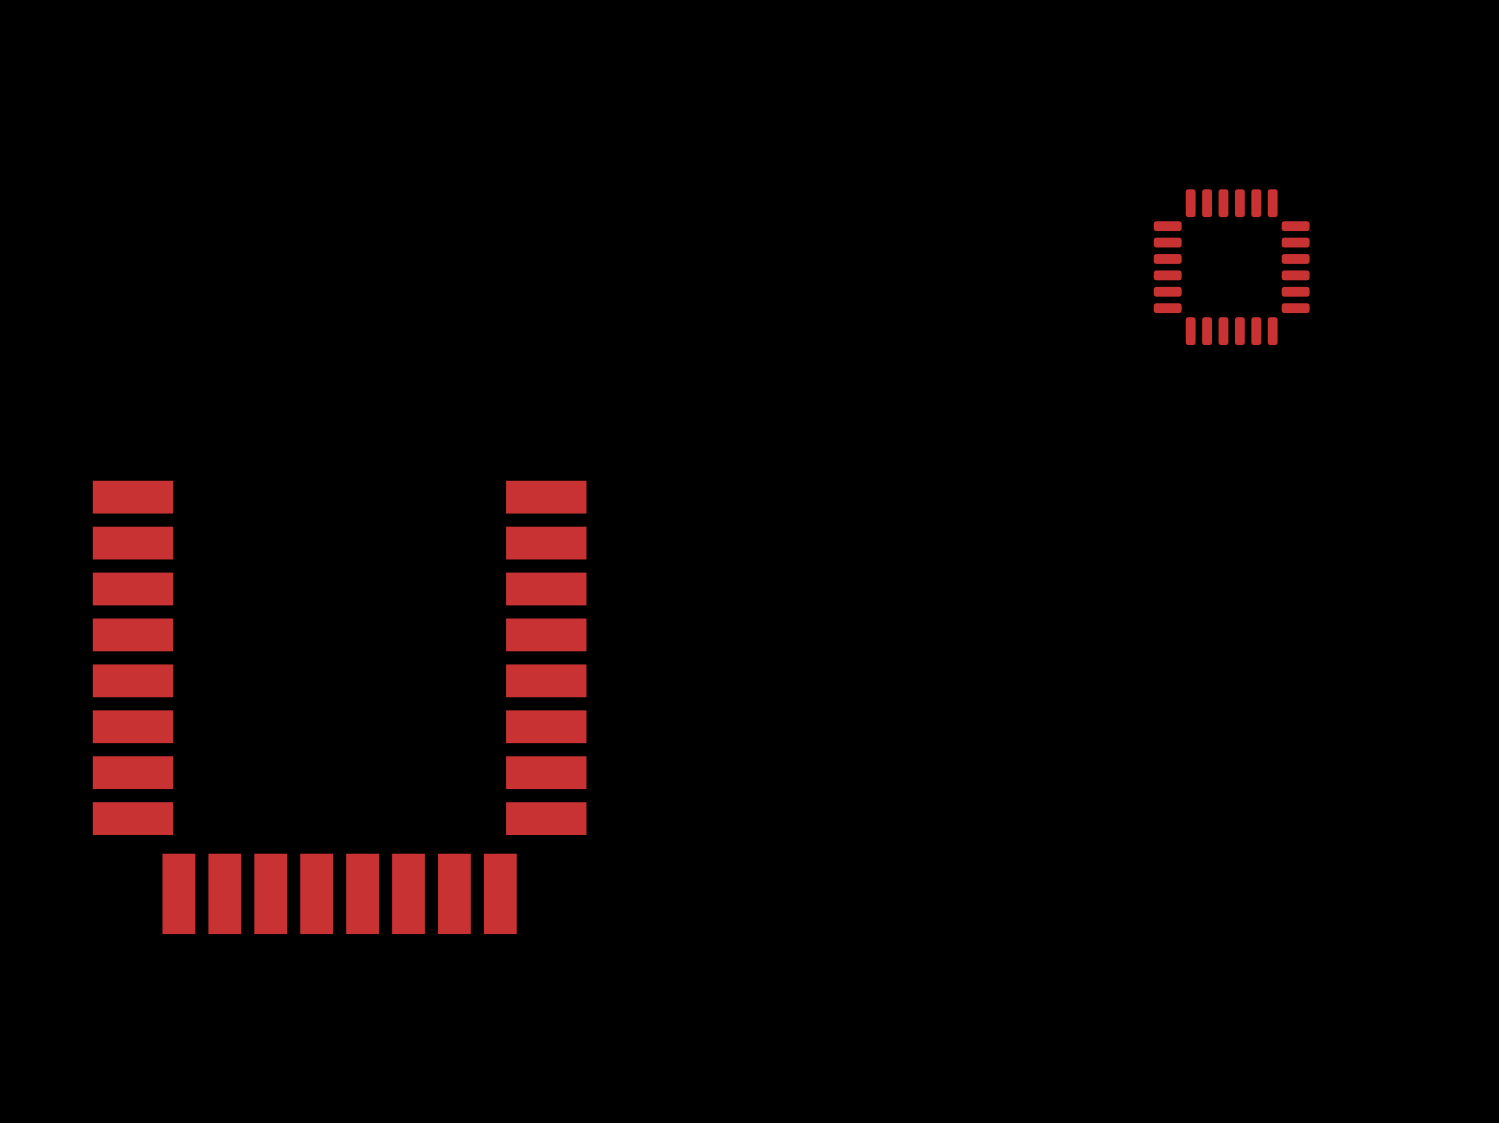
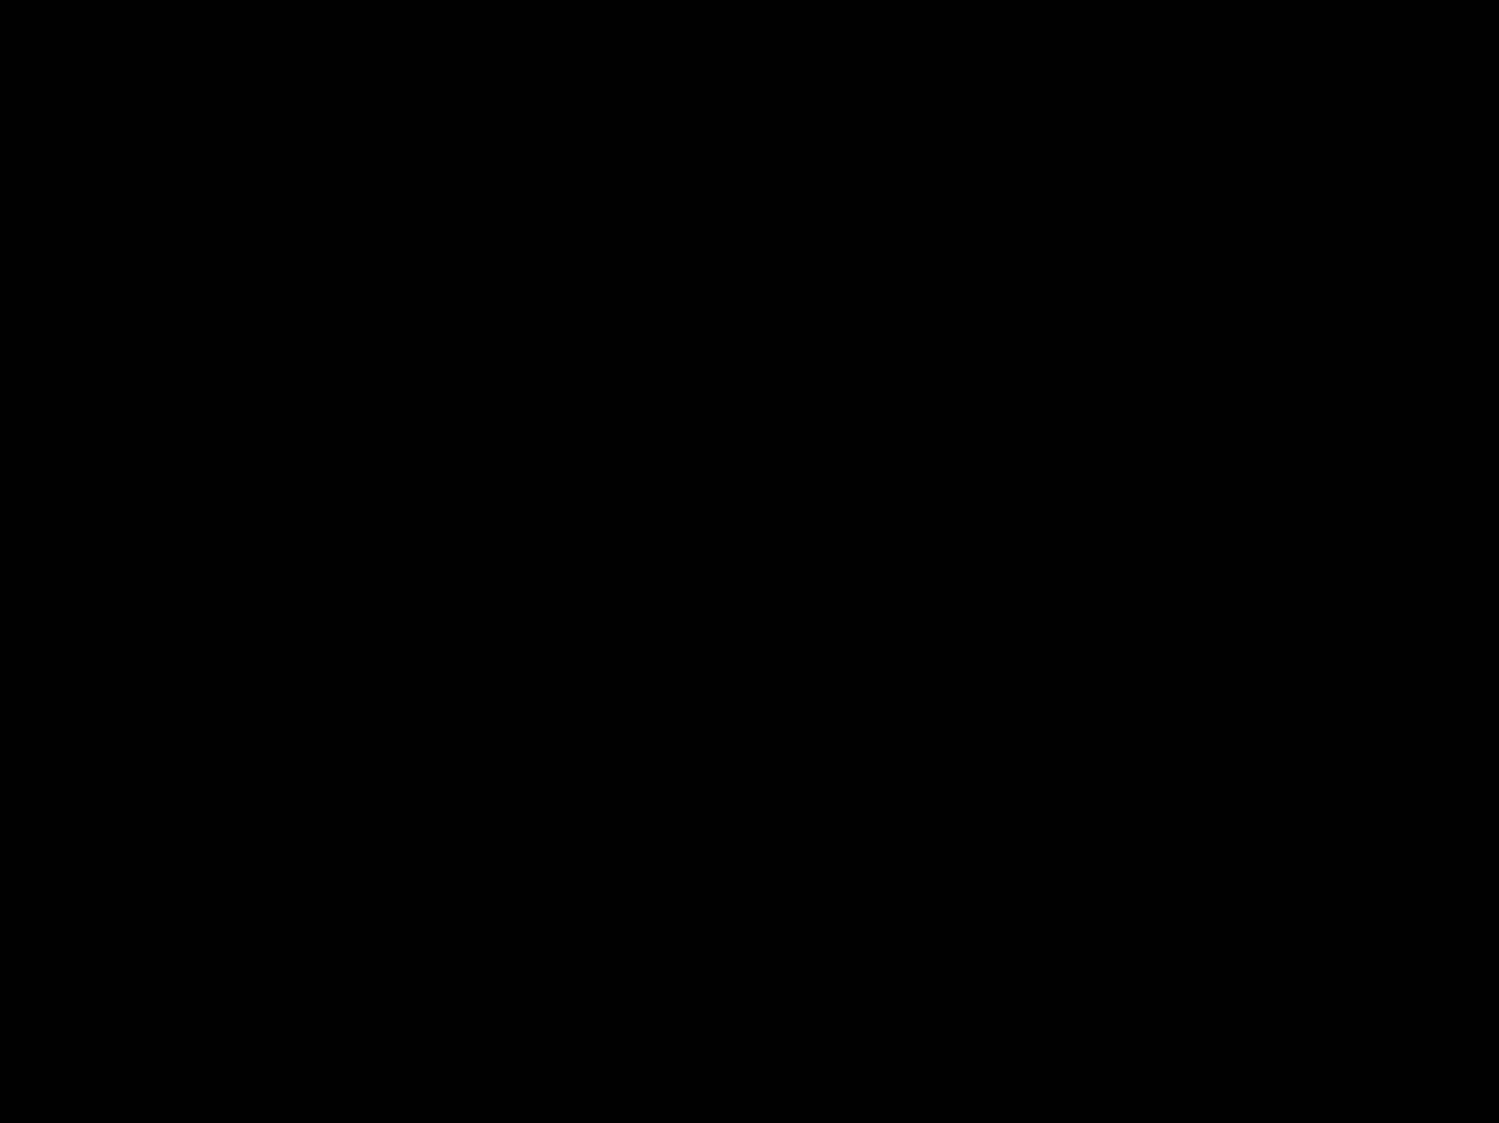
part: (1231, 267) -> none
part: (339, 707) -> none

